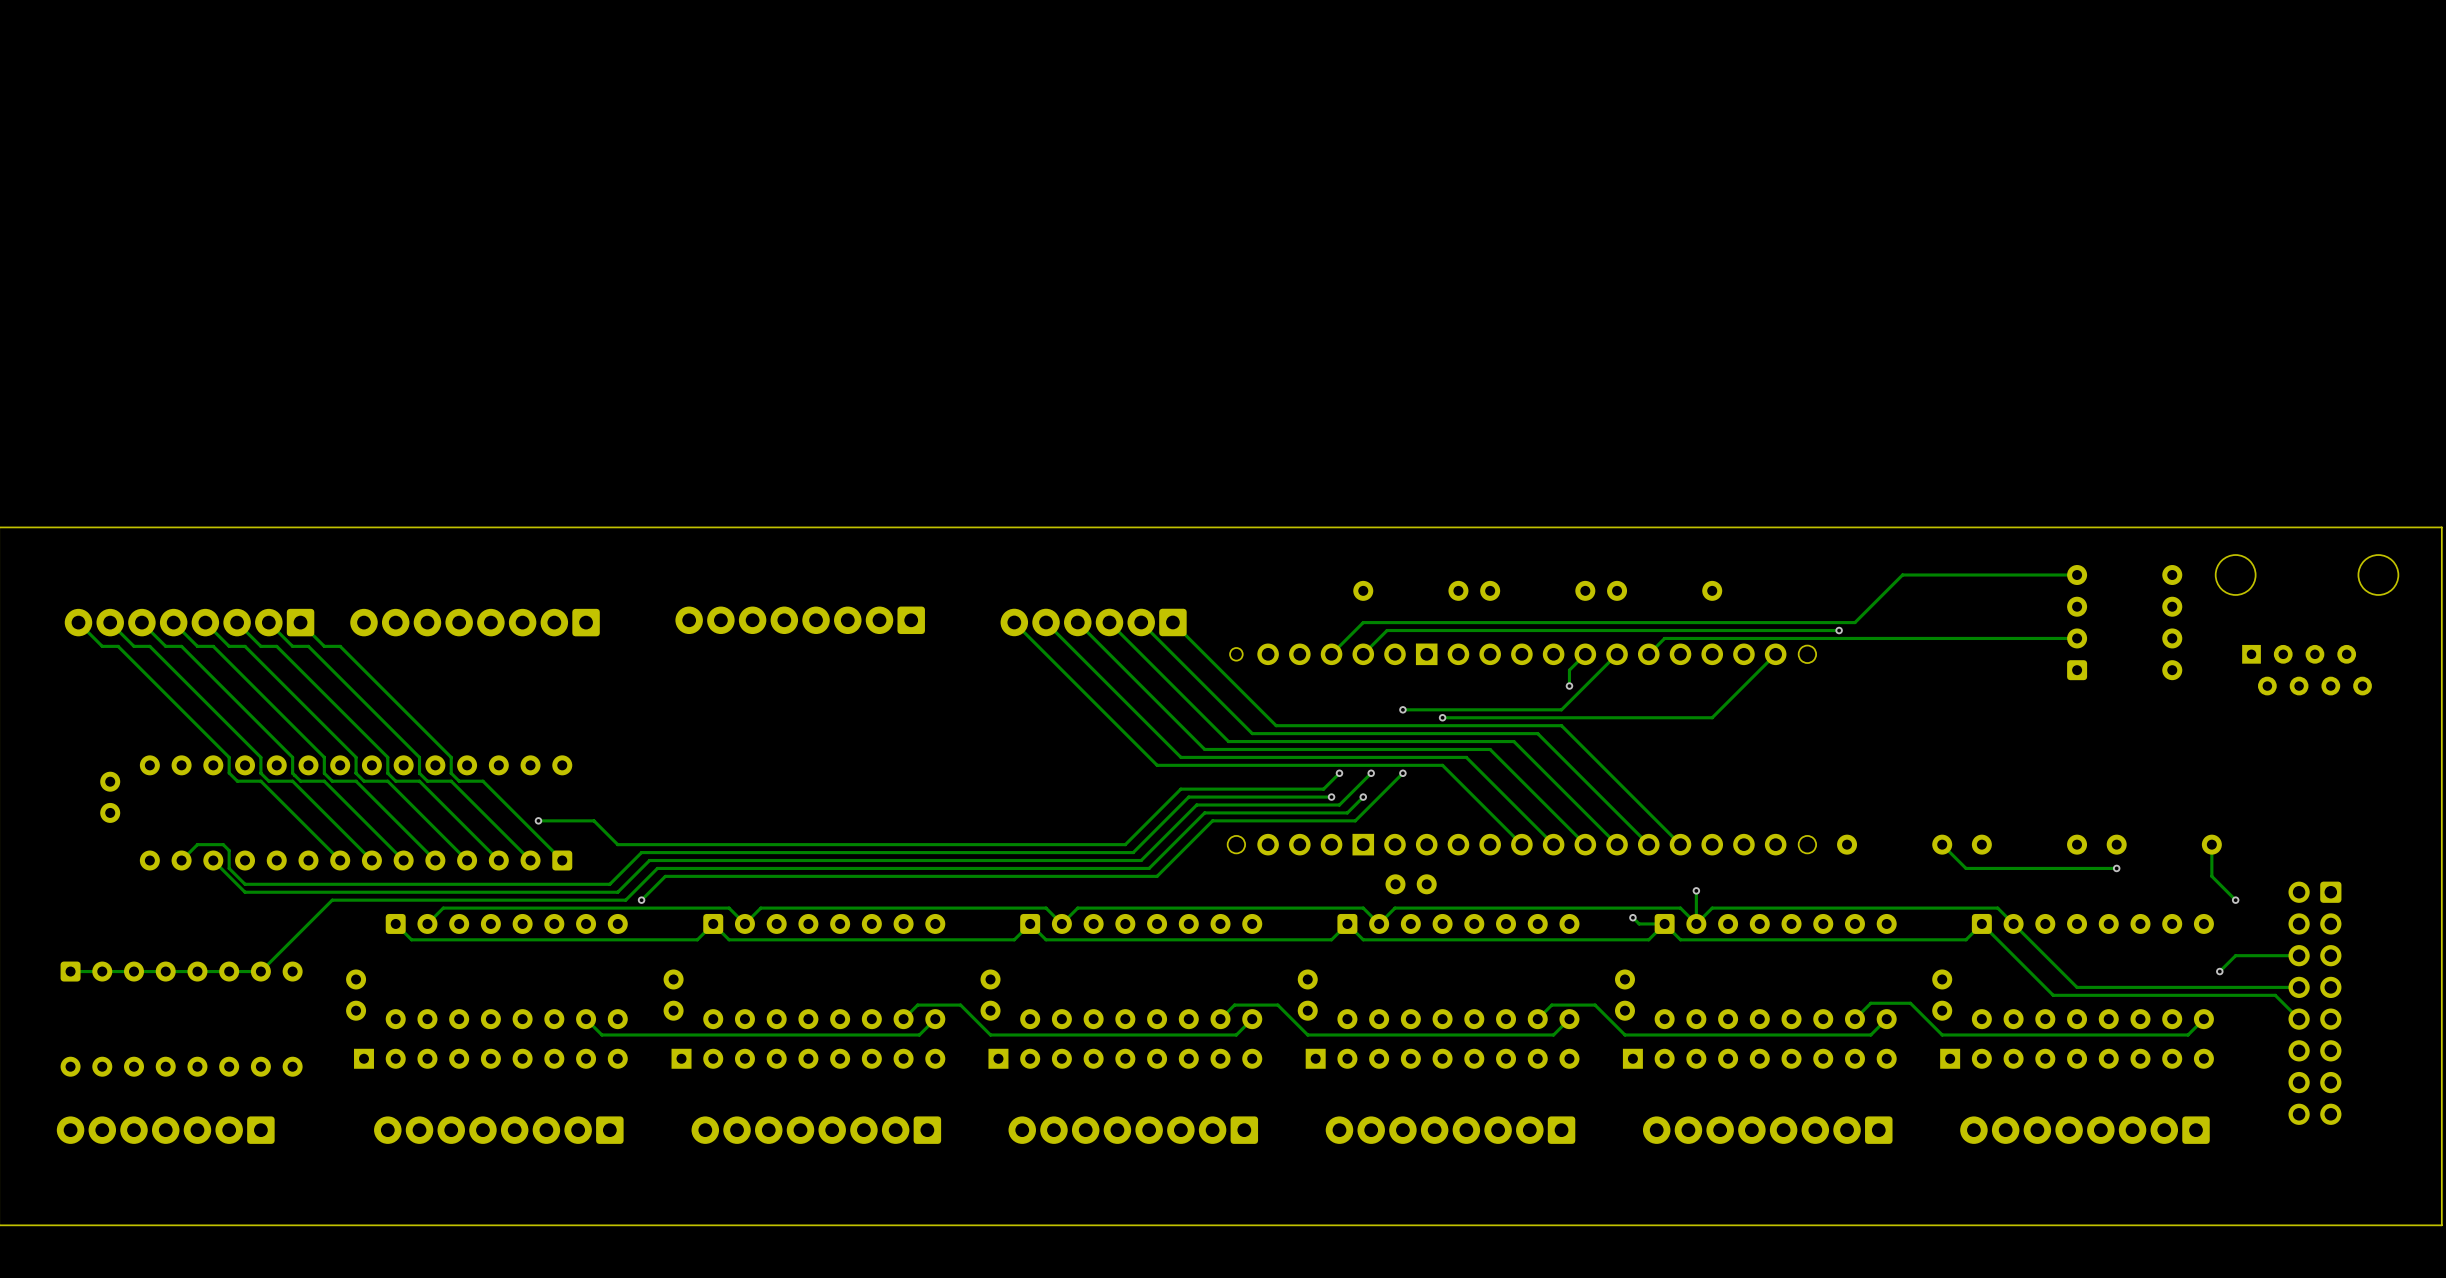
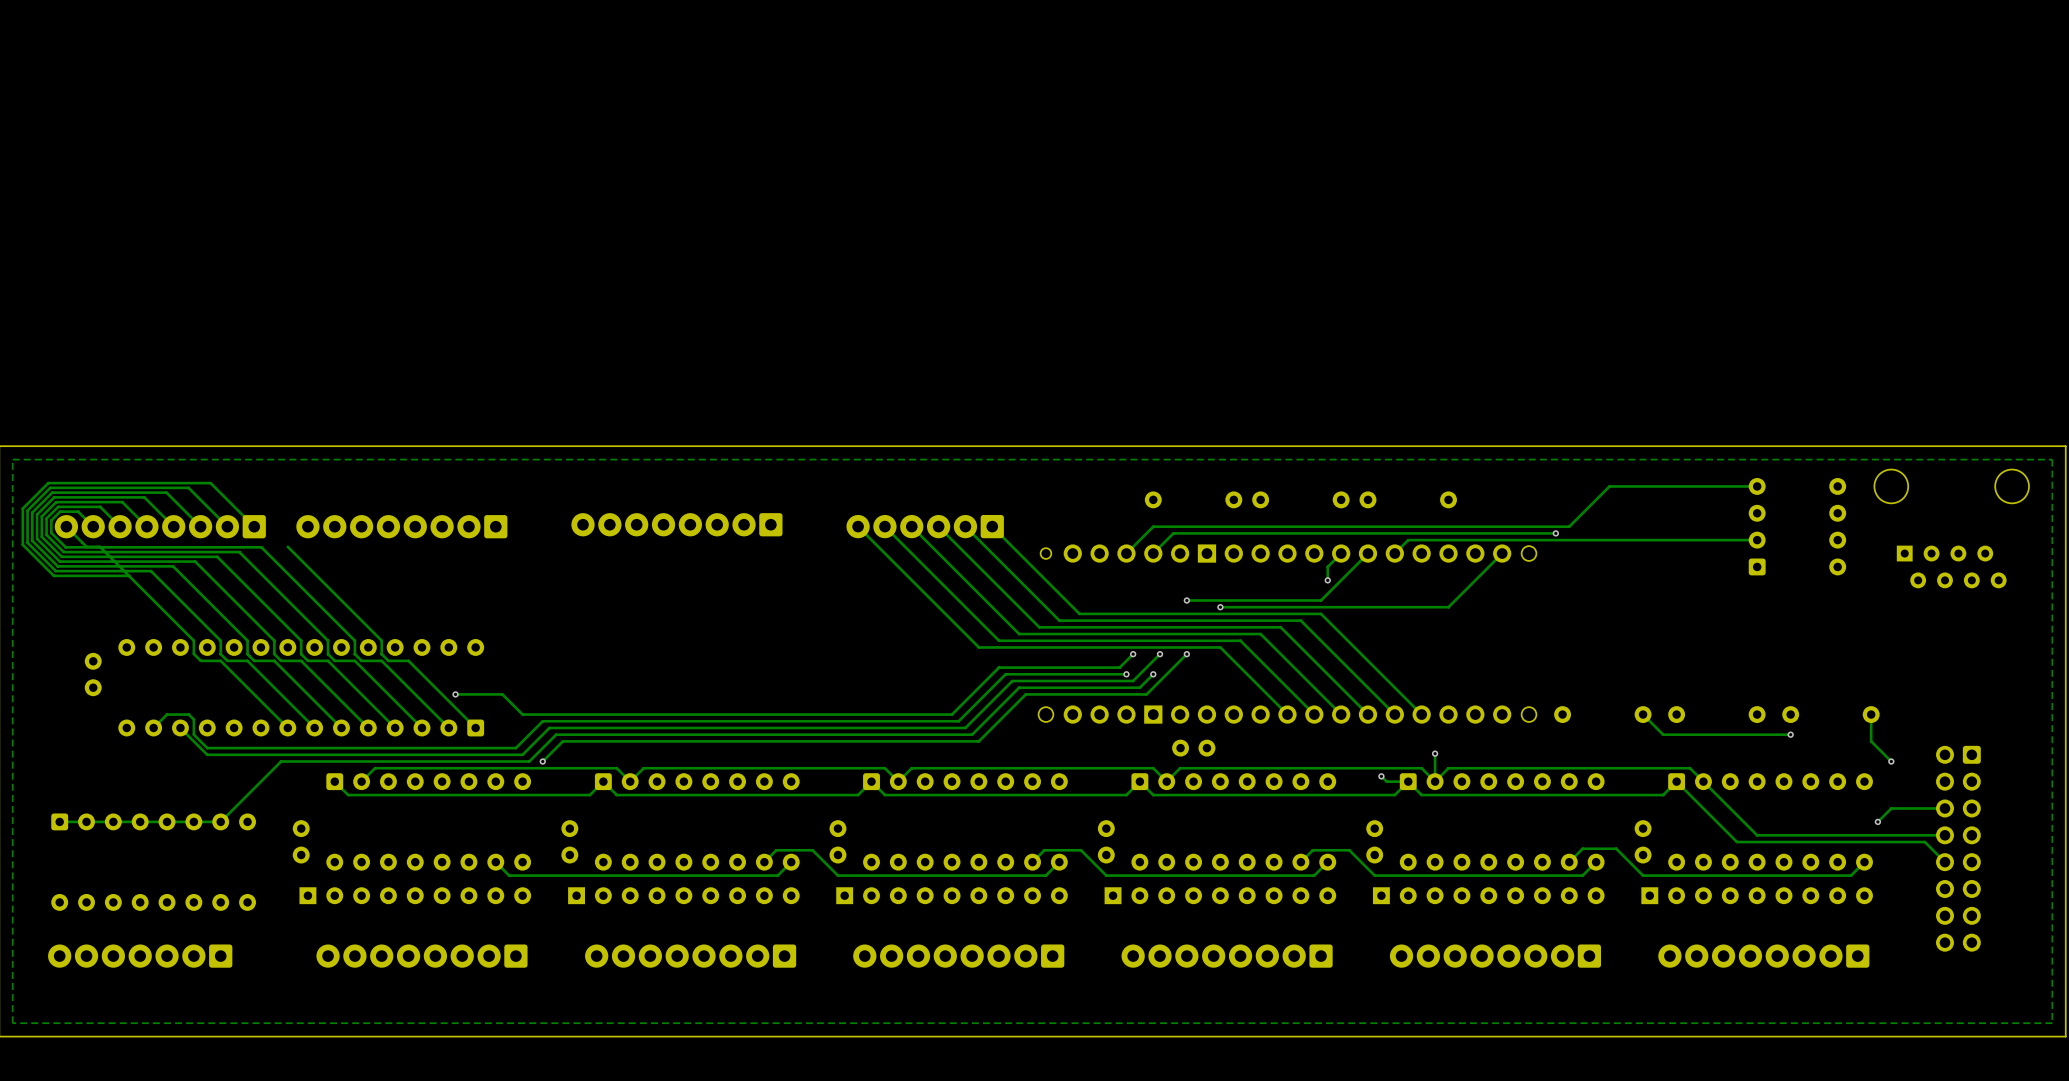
zone outline: none -> (2052, 459) (2052, 1023) (12, 1023) (12, 459) (2052, 459)
track: (110, 622) (134, 646) (149, 646) (178, 675) -> (93, 526) (78, 511) (60, 511) (51, 520) (51, 532) (65, 547) (261, 547)
track: (141, 622) (165, 646) (181, 646) (204, 669) -> (120, 526) (100, 506) (58, 506) (46, 518) (46, 534) (63, 552) (239, 552)
track: (173, 622) (197, 646) (213, 646) (230, 663) -> (146, 526) (122, 502) (56, 502) (41, 516) (41, 536) (61, 556) (217, 556)
track: (205, 622) (229, 646) (245, 646) (256, 658) -> (173, 526) (144, 497) (54, 497) (37, 514) (37, 538) (59, 561) (195, 561)
track: (237, 622) (260, 646) (276, 646) (282, 652) -> (200, 526) (166, 492) (52, 492) (32, 512) (32, 540) (57, 566) (173, 566)
track: (268, 622) (292, 646) (309, 646) -> (227, 526) (188, 487) (50, 487) (27, 510) (27, 542) (55, 571) (151, 571)
track: (300, 622) (324, 646) (340, 646) -> (254, 526) (210, 483) (48, 483) (22, 508) (22, 544) (53, 575) (129, 575)

